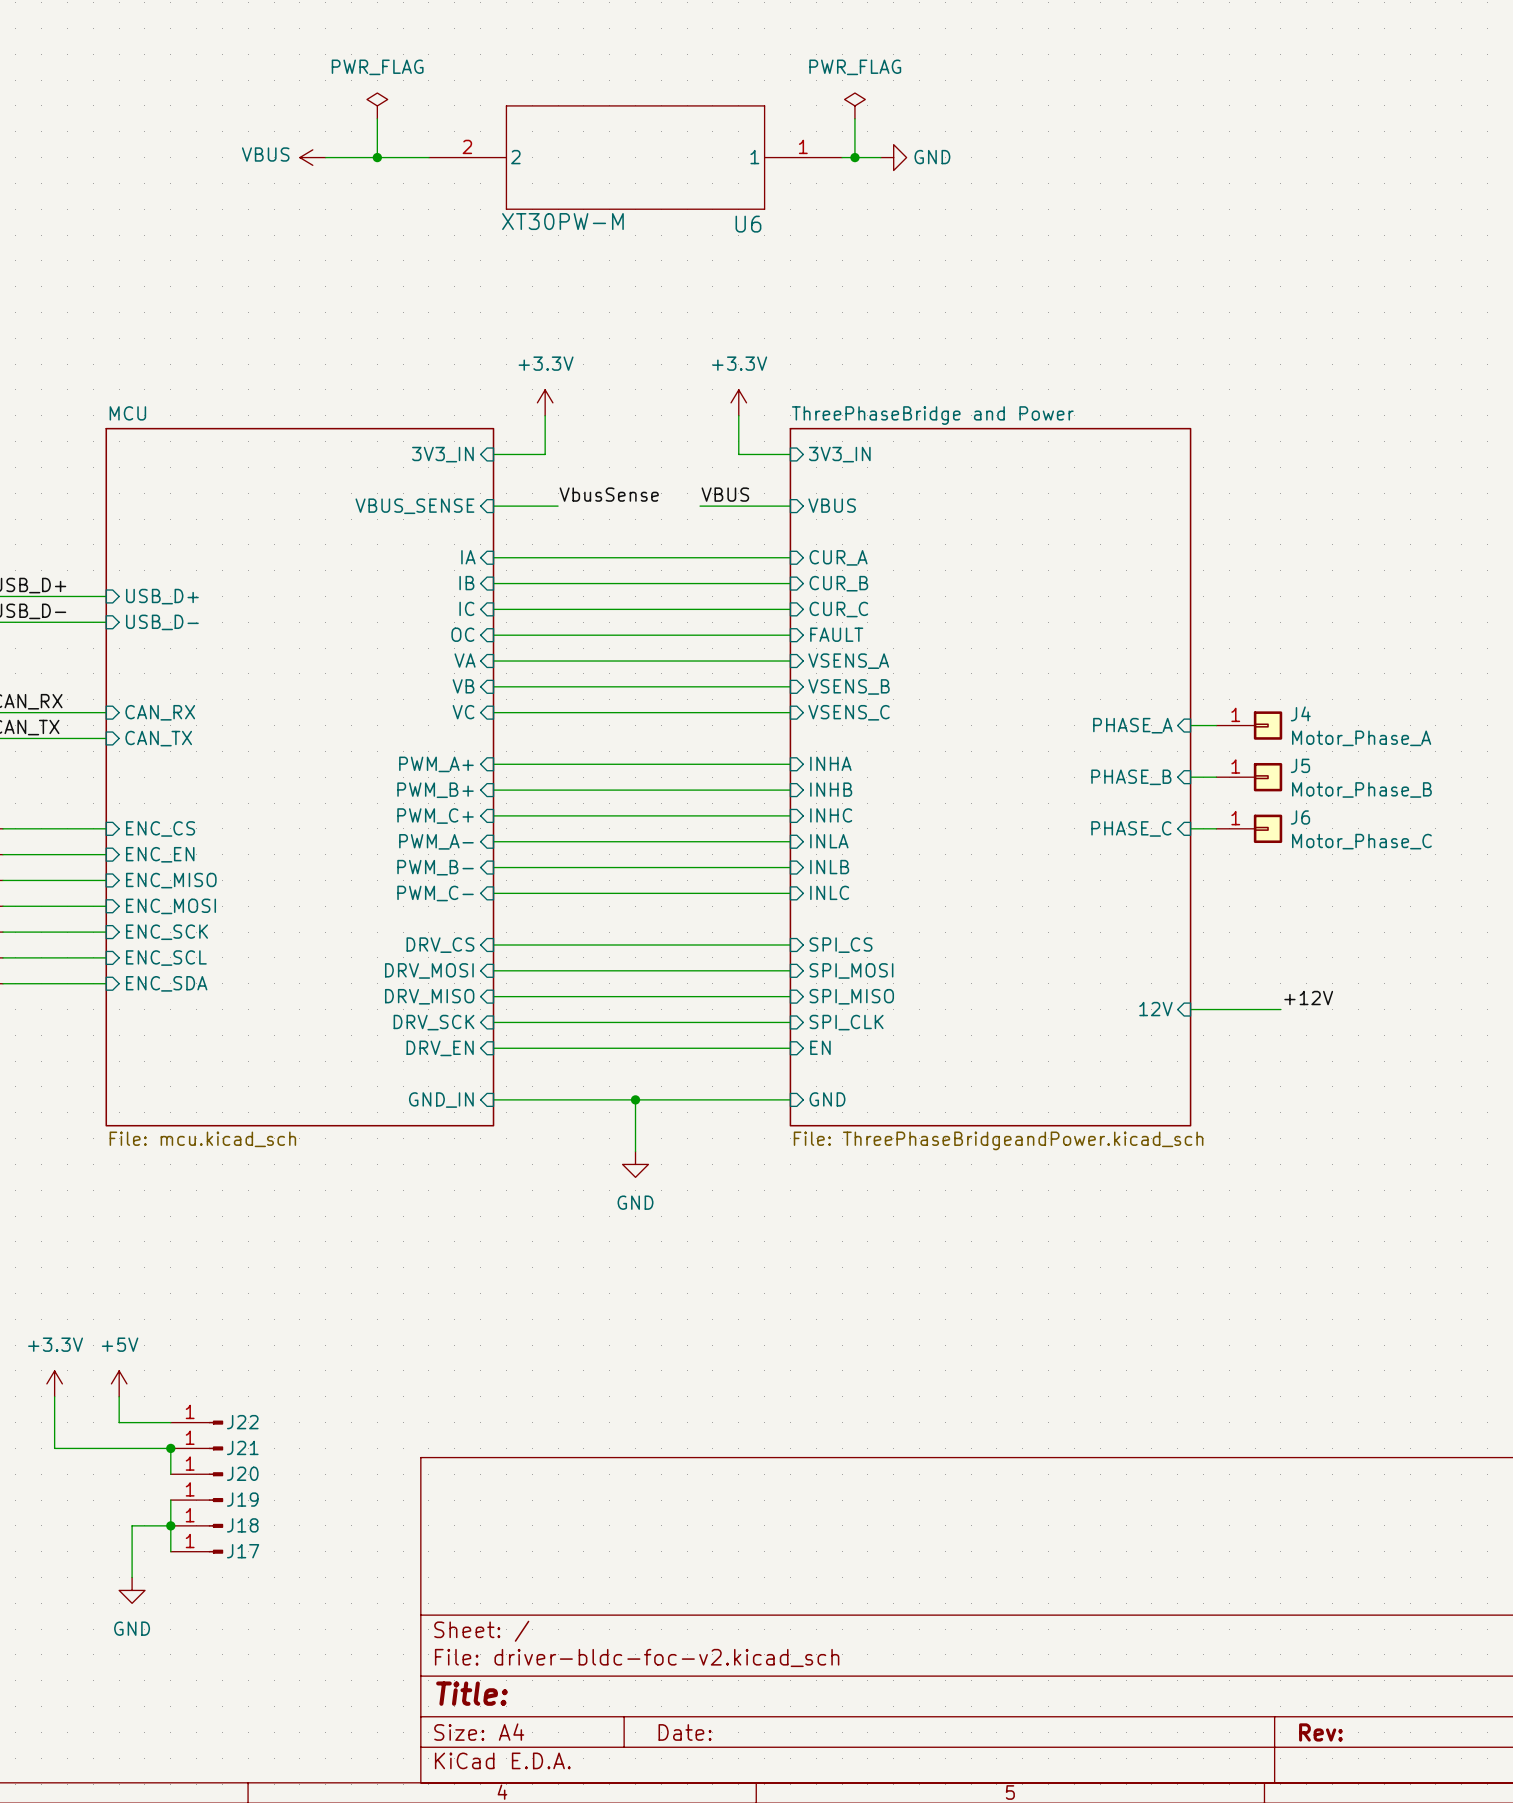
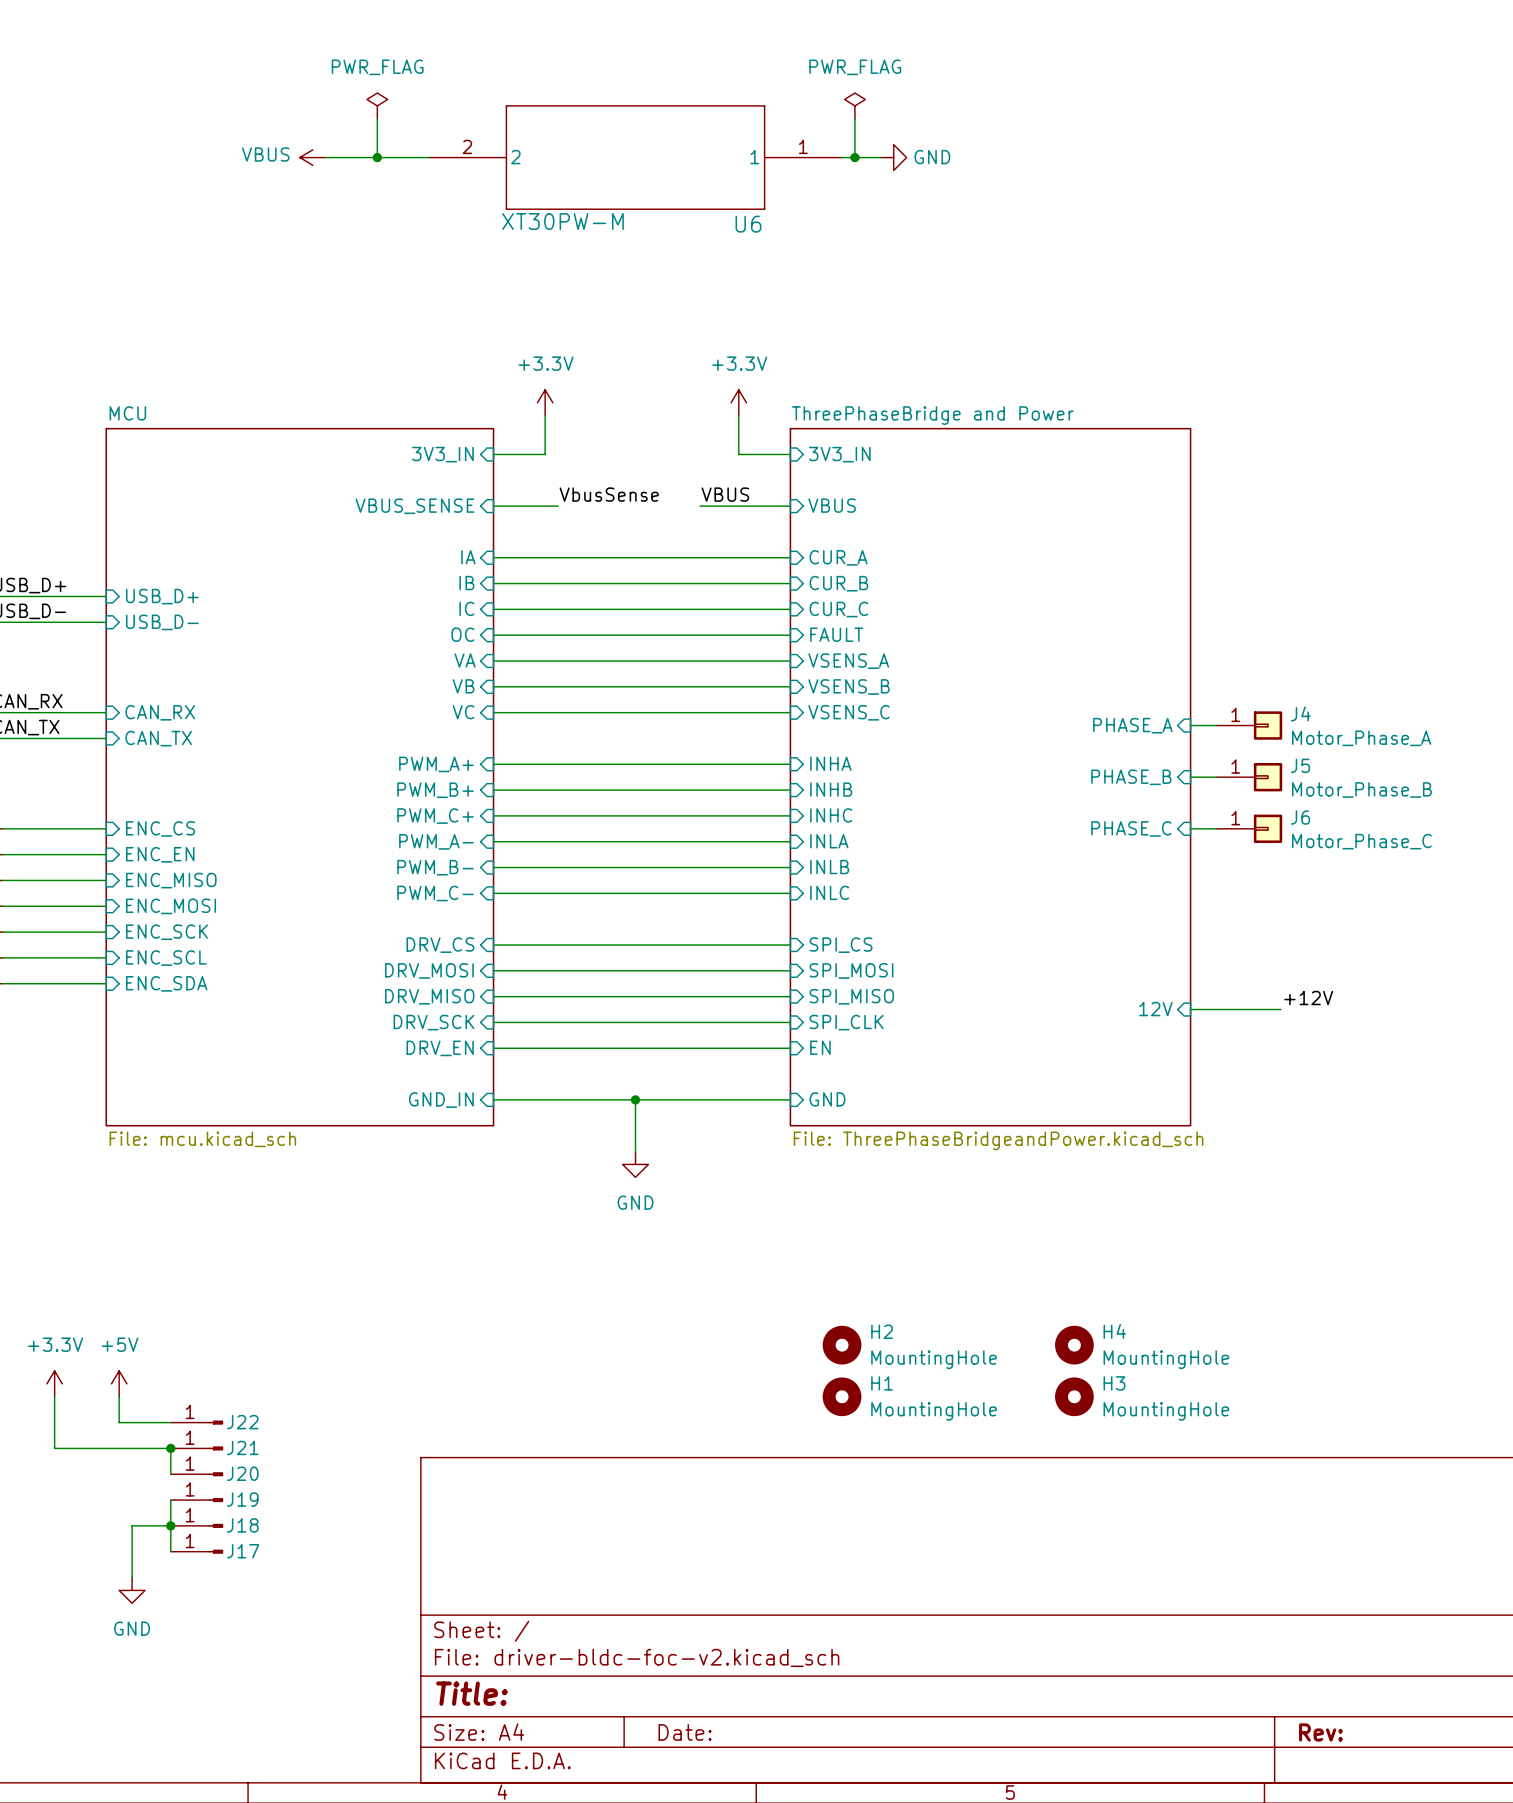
H2: none -> MountingHole (842, 1345)
H4: none -> MountingHole (1074, 1345)
H1: none -> MountingHole (842, 1396)
H3: none -> MountingHole (1074, 1396)

